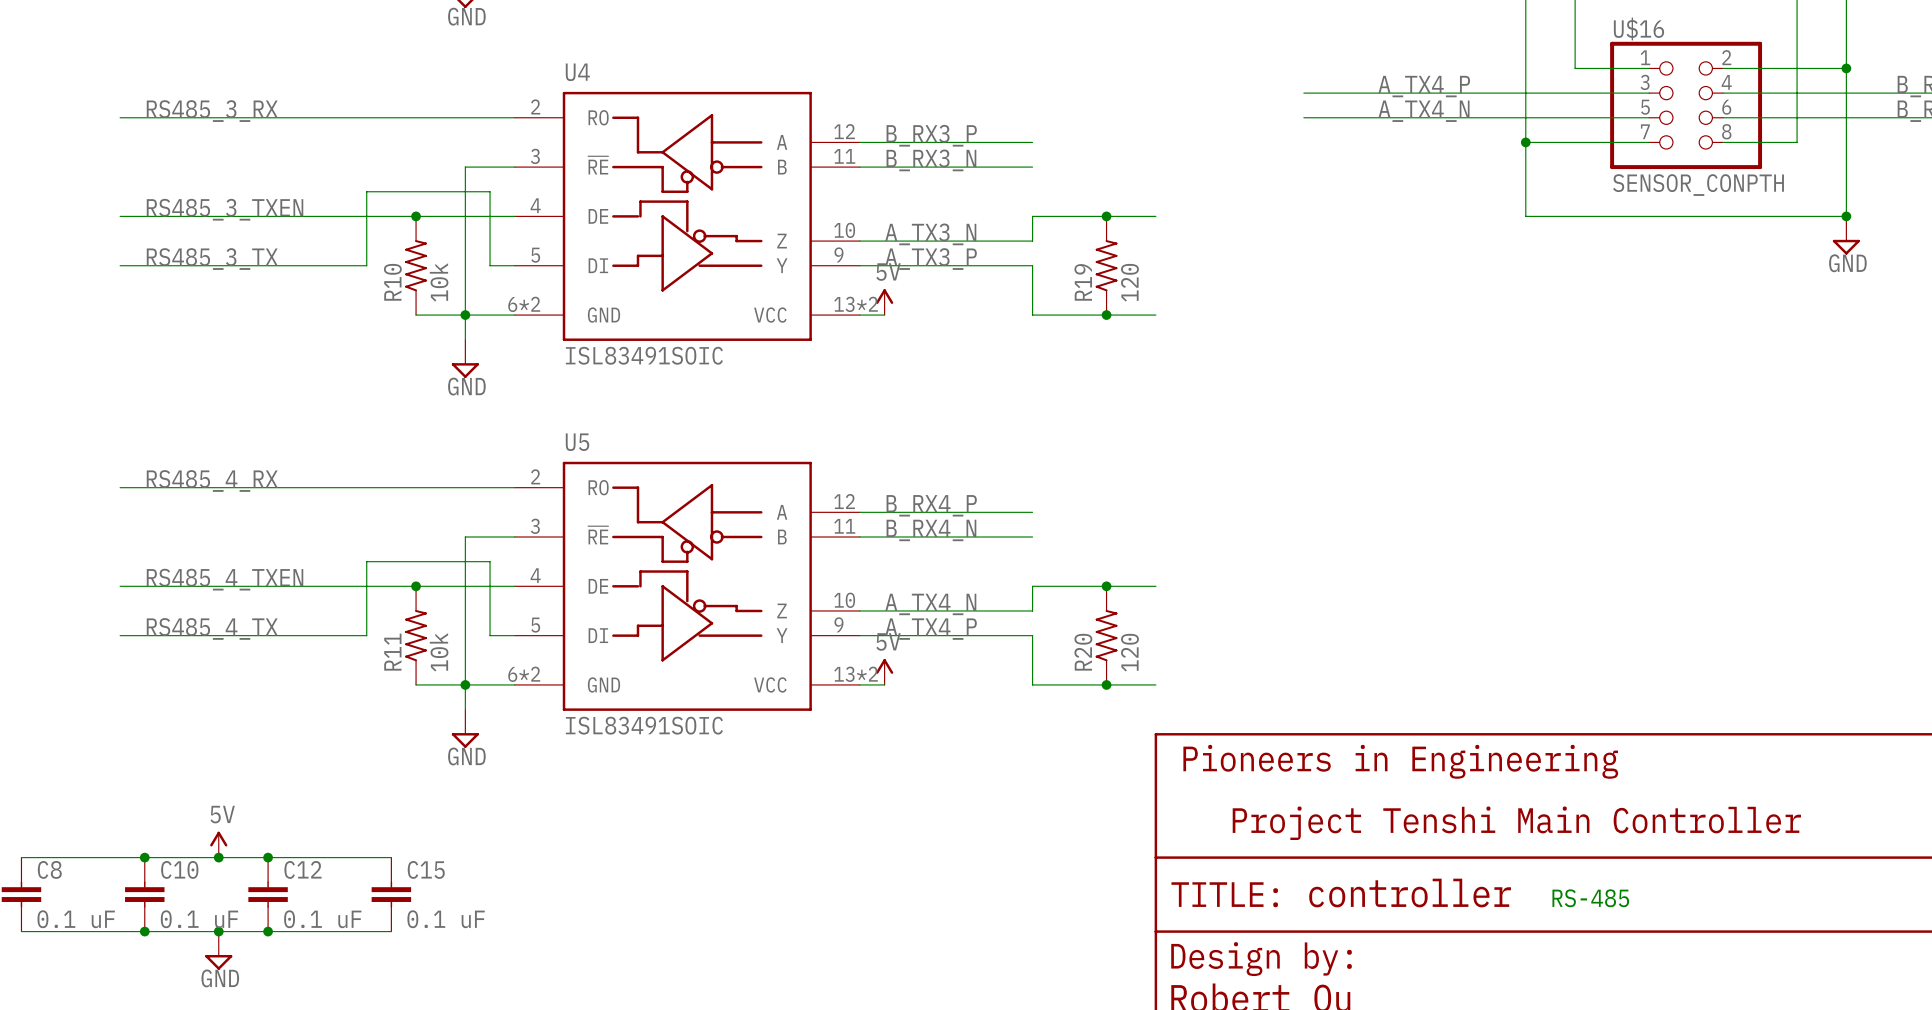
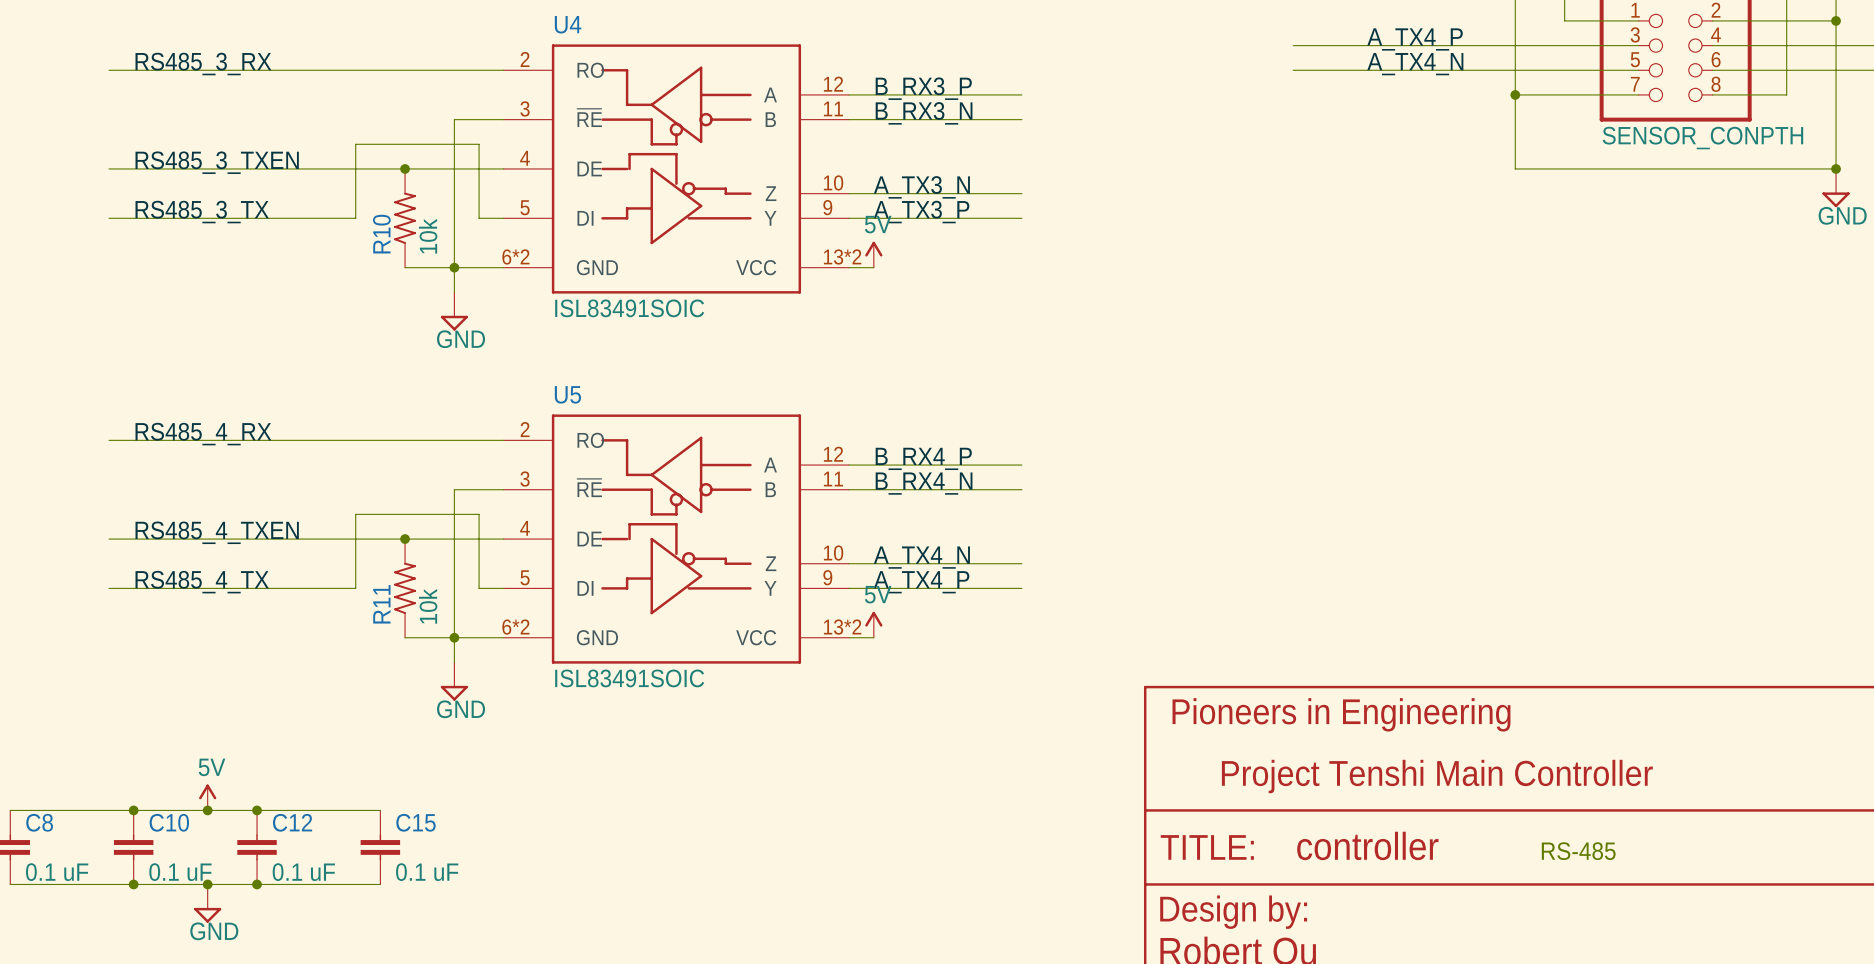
junction: (1106, 216) -> none
wire: (1155, 216) (1032, 216) (1032, 241) -> none
wire: (1032, 265) (1032, 315) (1155, 315) -> none
R19: 120 (1106, 265) -> none
junction: (1106, 315) -> none
junction: (1106, 586) -> none
wire: (1155, 586) (1032, 586) (1032, 610) -> none
wire: (1032, 635) (1032, 684) (1155, 684) -> none
R20: 120 (1106, 635) -> none
junction: (1106, 684) -> none

